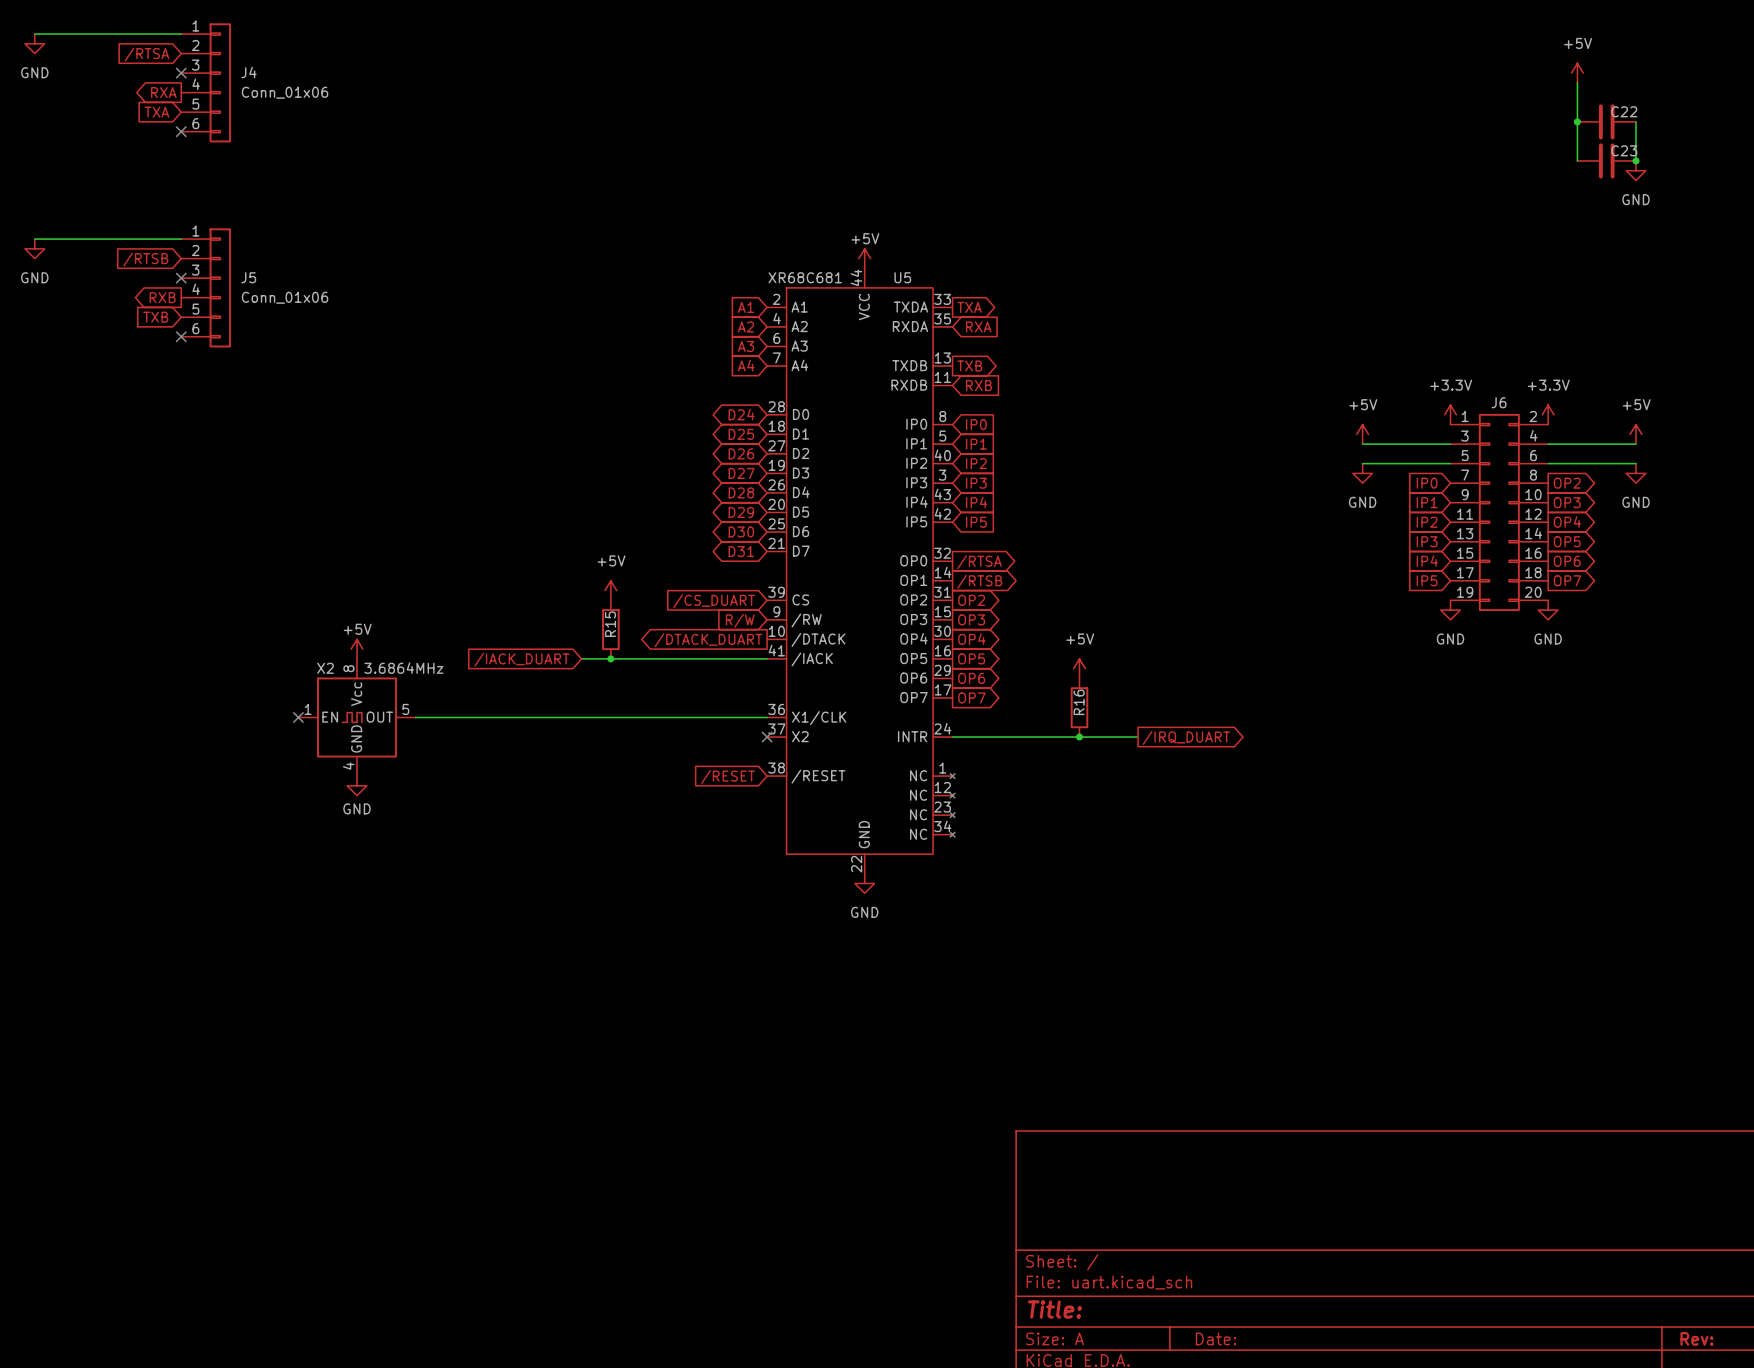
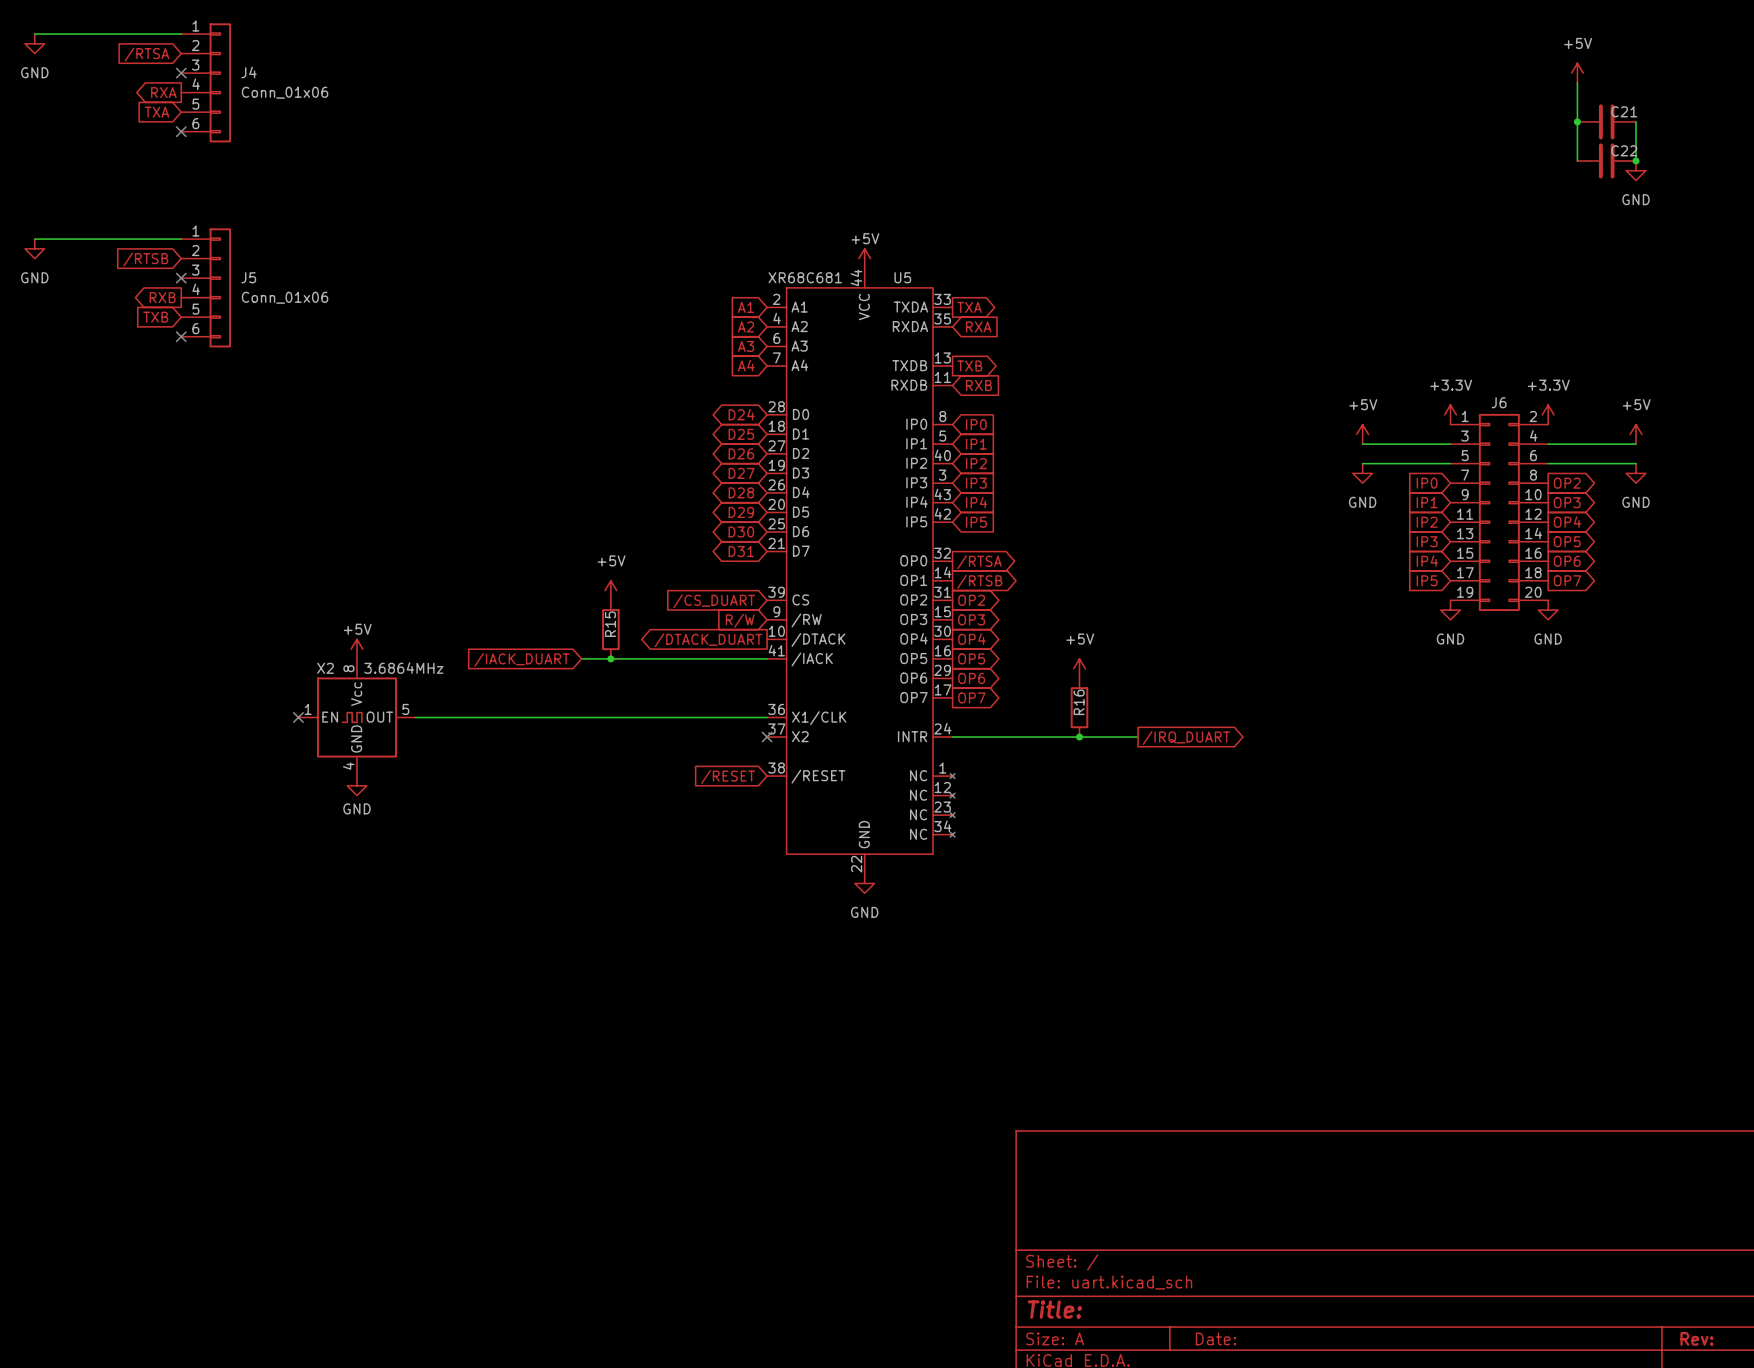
C22 name: C22 (1624, 111) -> C21 (1624, 111)
C23 name: C23 (1624, 150) -> C22 (1624, 150)

